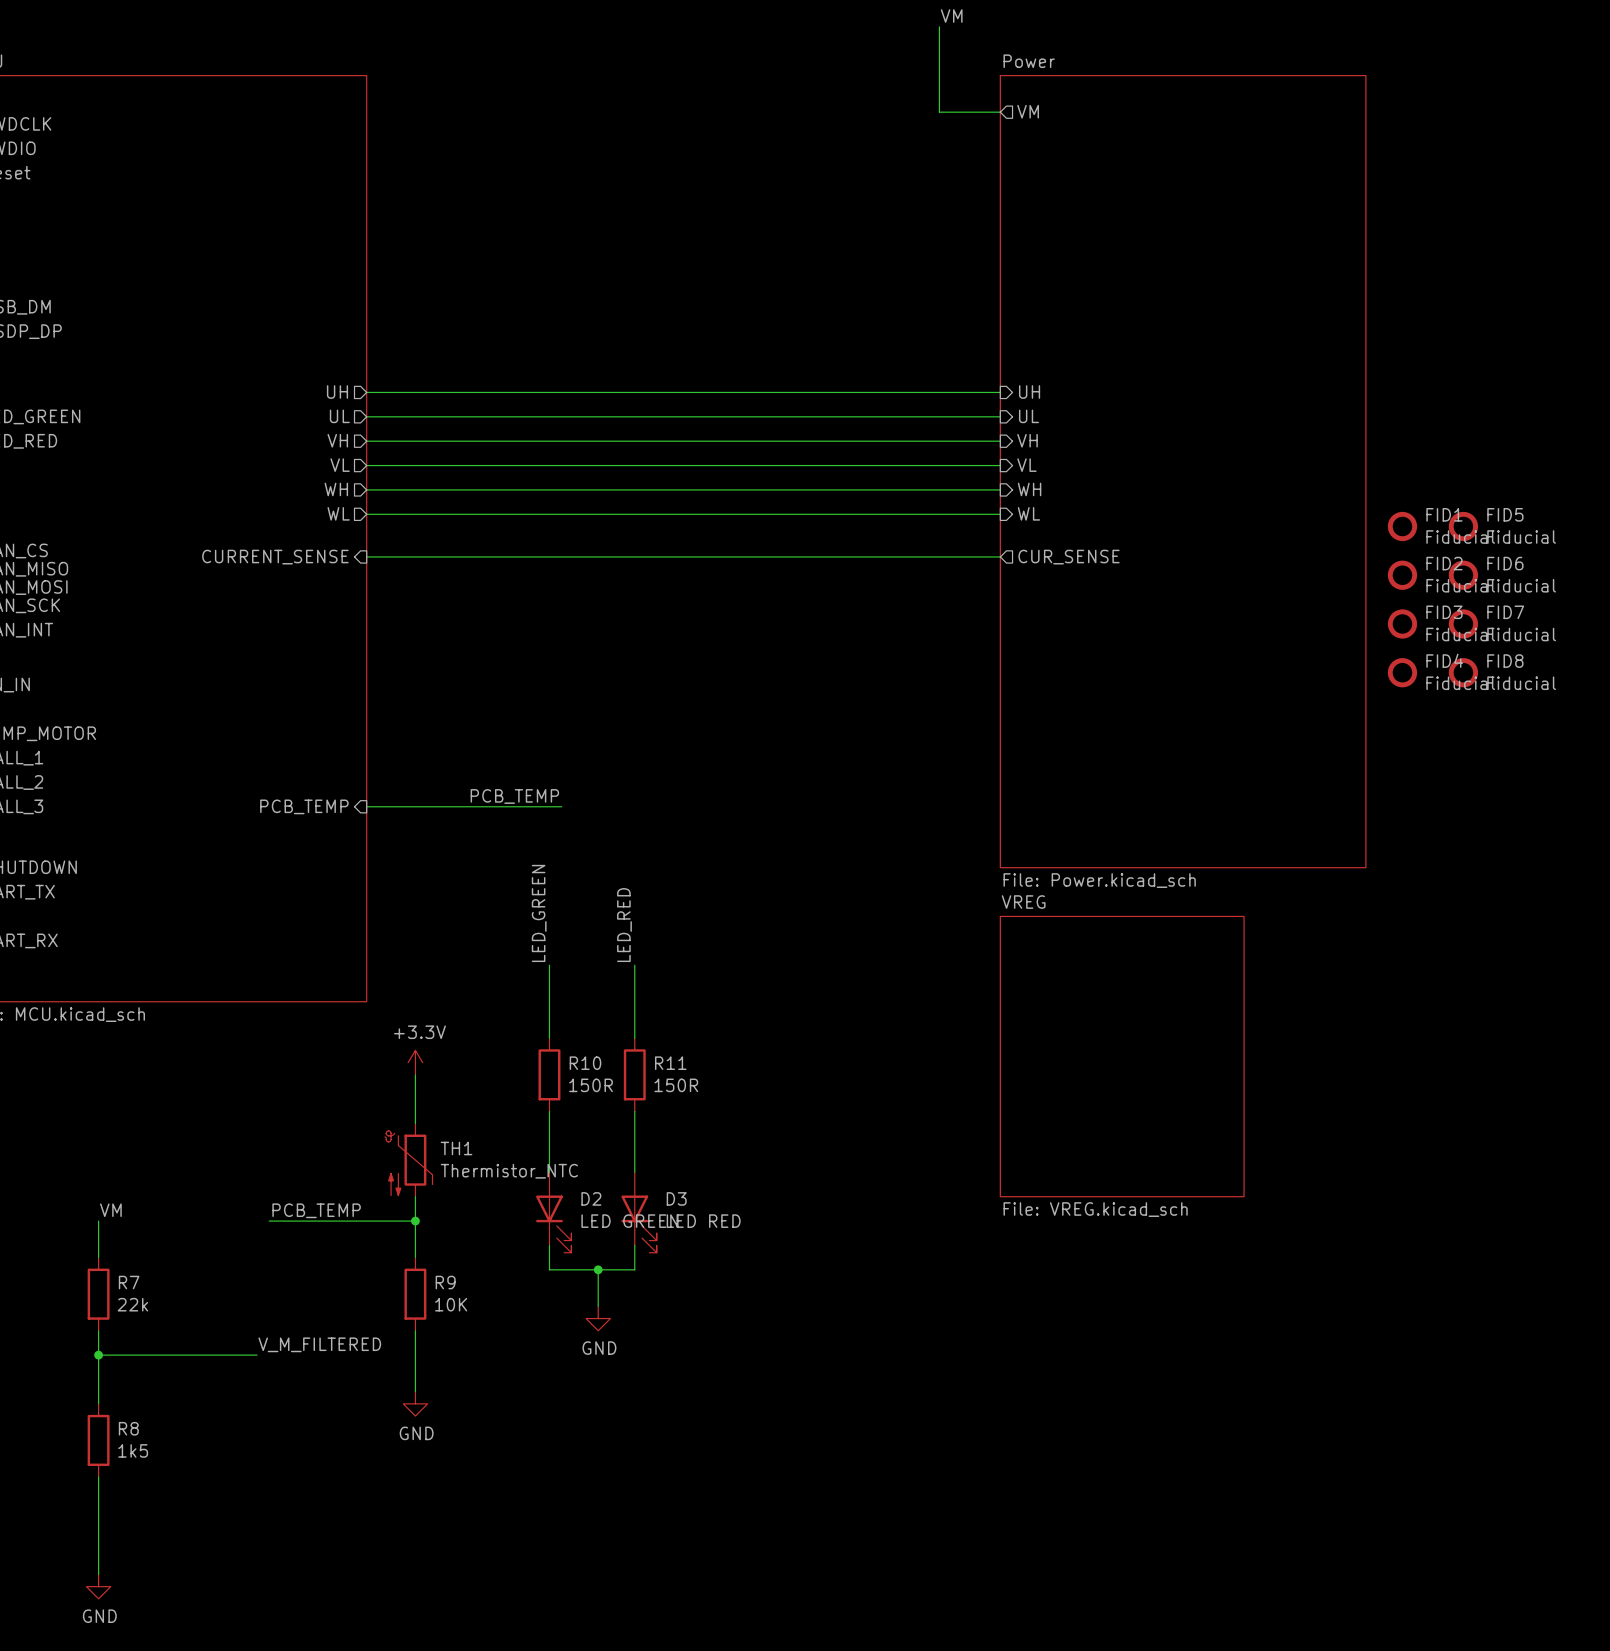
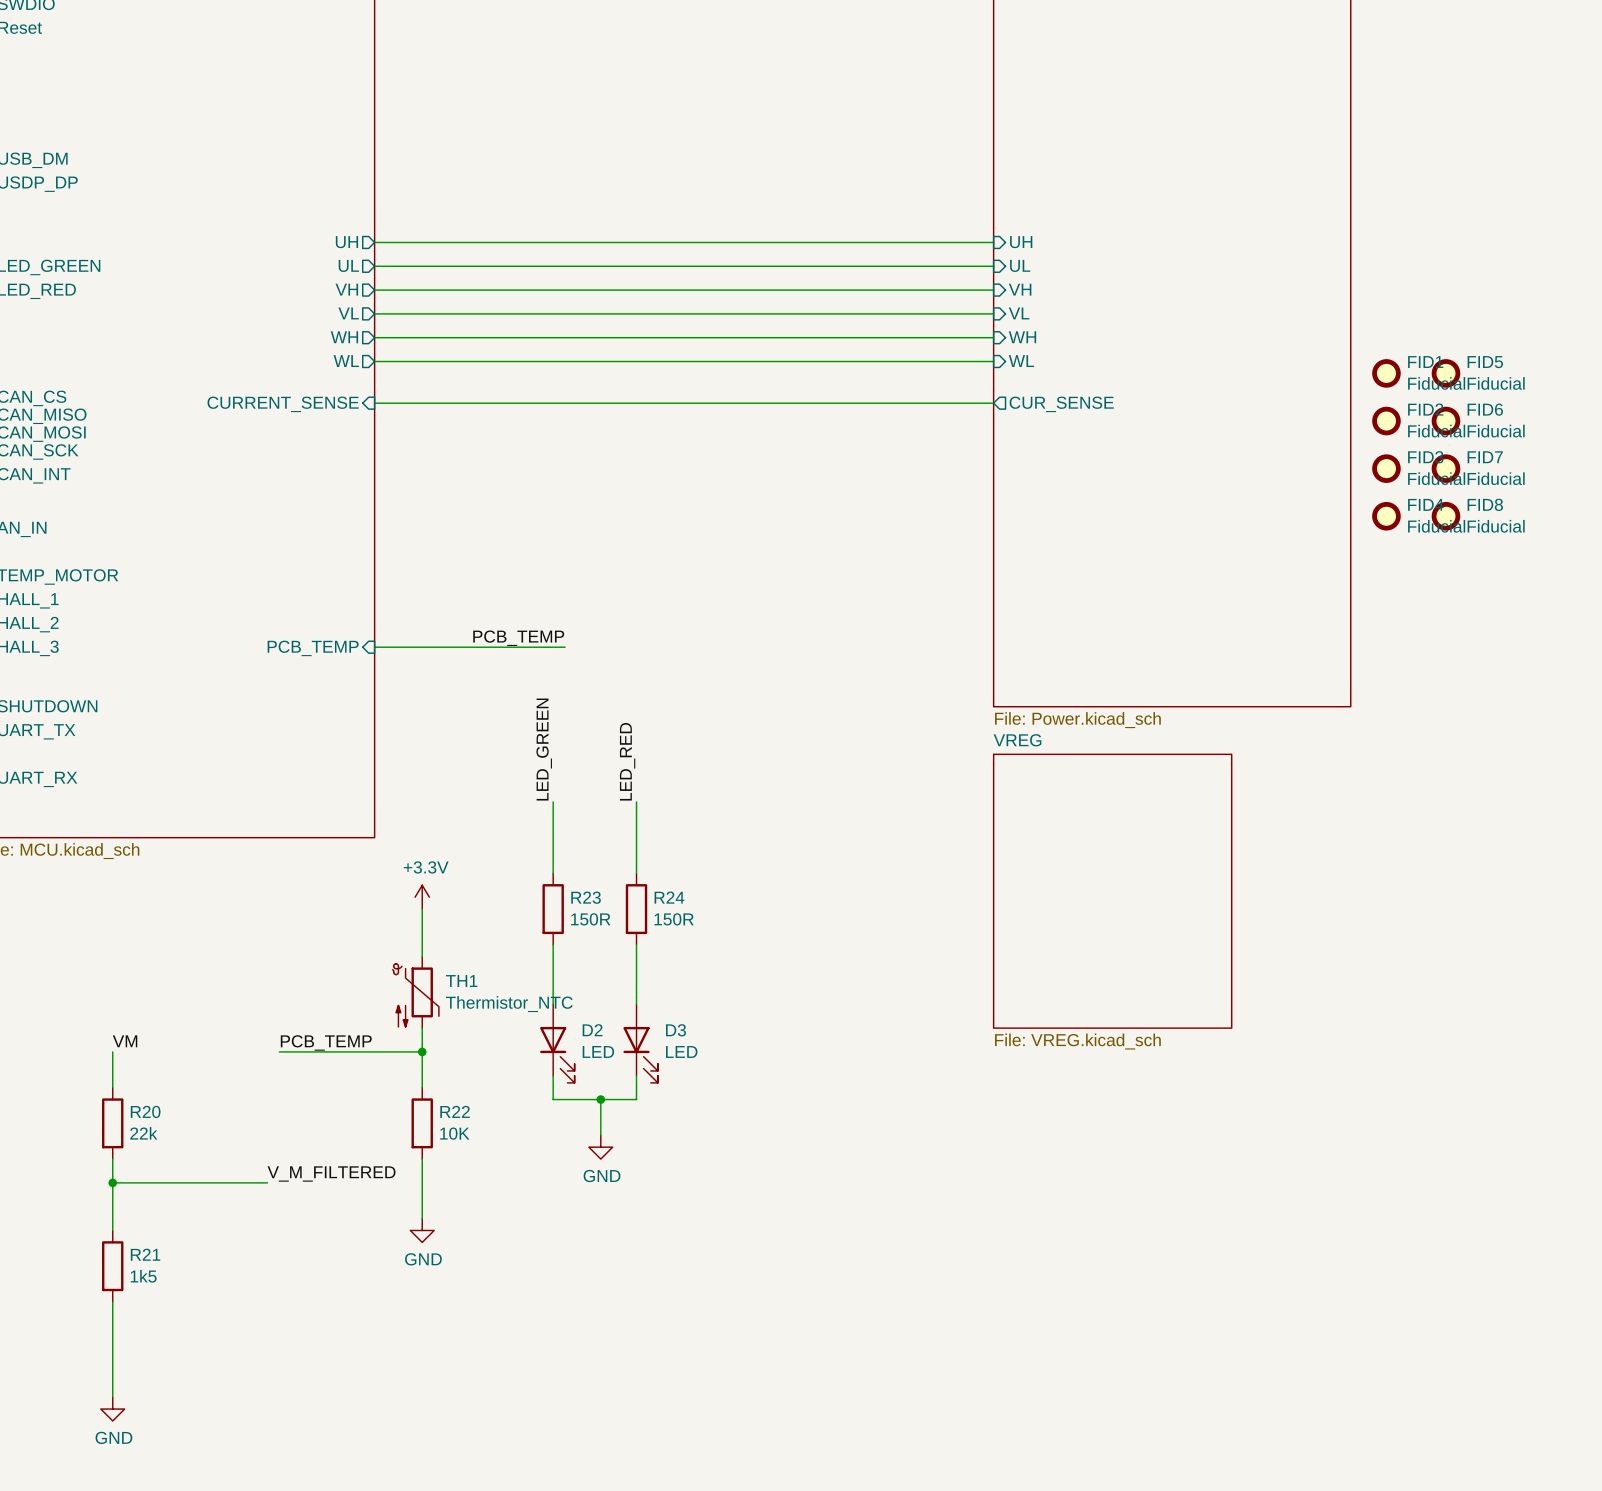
R10 name: R10 (585, 1063) -> R23 (586, 897)
R11 name: R11 (670, 1063) -> R24 (669, 897)
D2 value: LED GREEN (629, 1221) -> LED (598, 1051)
D3 value: LED RED (703, 1221) -> LED (681, 1051)
R7 name: R7 (129, 1282) -> R20 (145, 1111)
R9 name: R9 (445, 1282) -> R22 (455, 1111)
R8 name: R8 (128, 1428) -> R21 (145, 1254)

